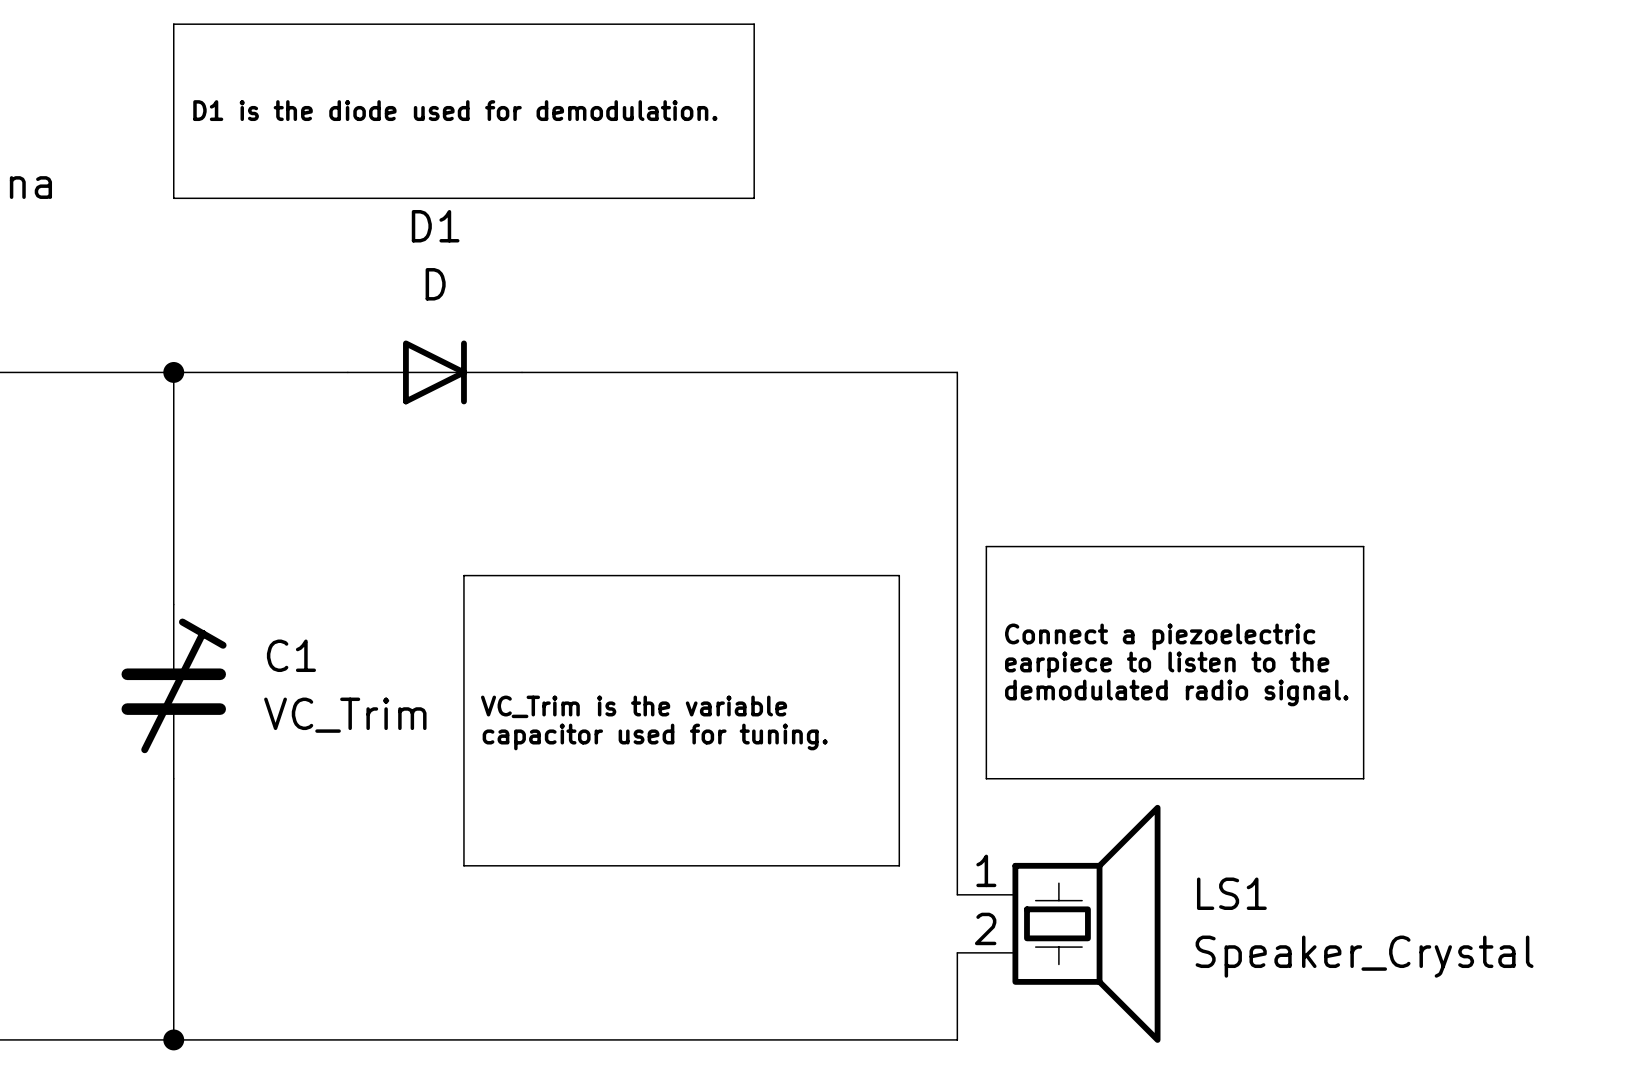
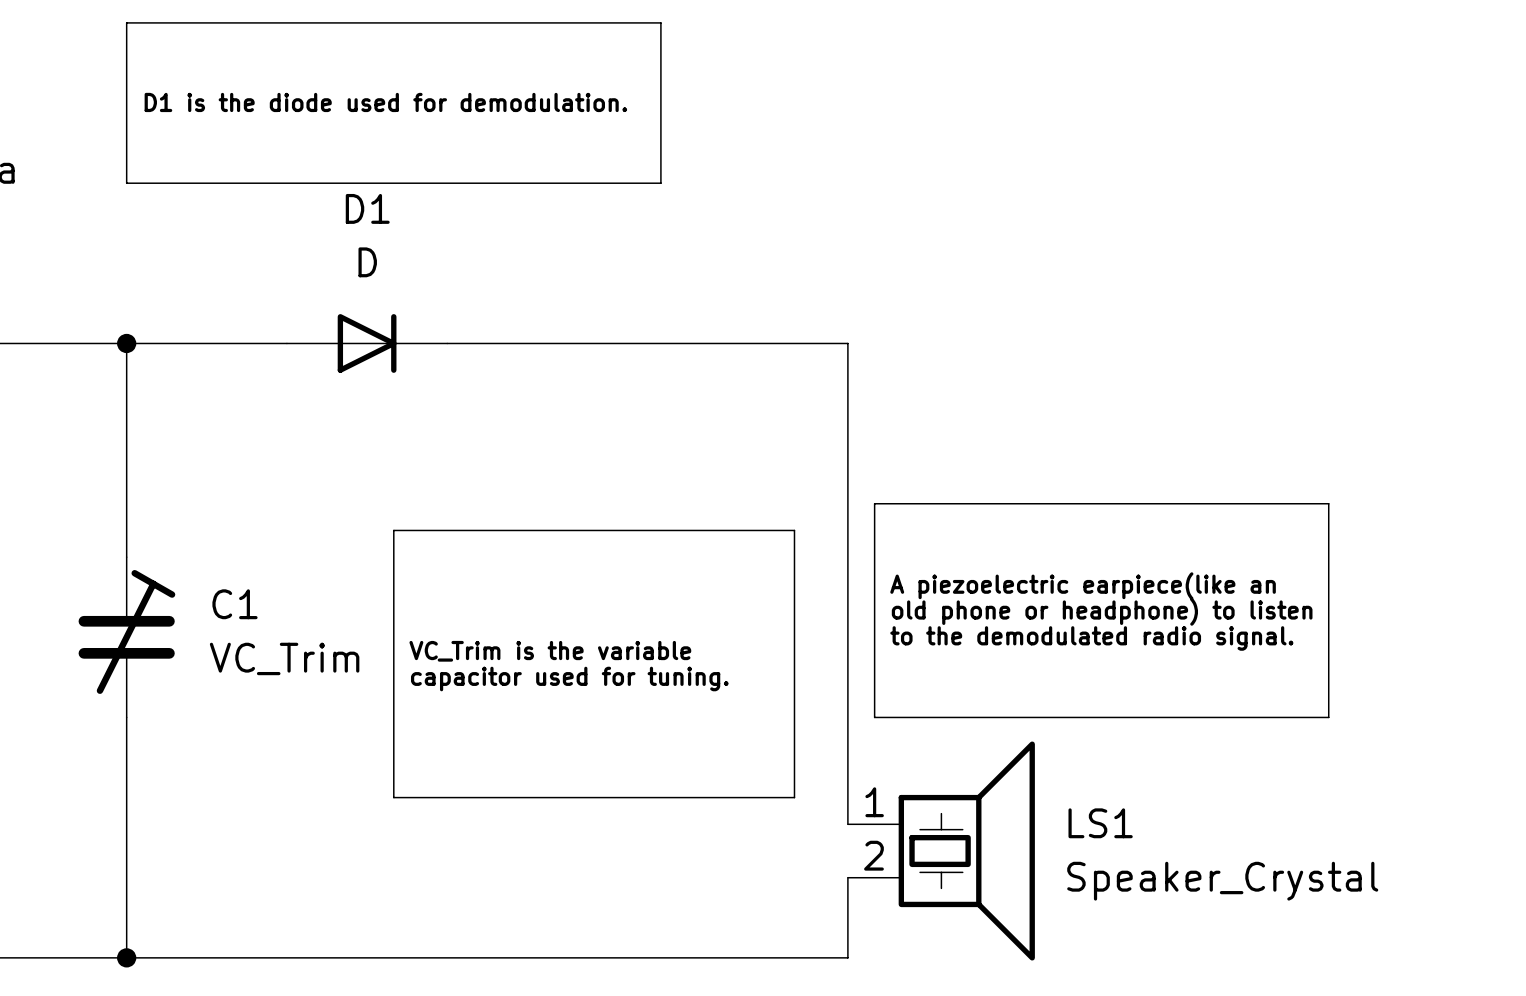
line: (1363, 546) (1363, 778) -> (1221, 503) (1328, 503) (1328, 717) (1221, 717)
text: Connect a piezoelectric (1160, 636) -> A piezoelectric earpiece(like an (1083, 586)
text: earpiece to listen to the (1167, 664) -> old phone or headphone) to listen (1102, 611)
text: demodulated radio signal. (1176, 692) -> to the demodulated radio signal. (1091, 638)

